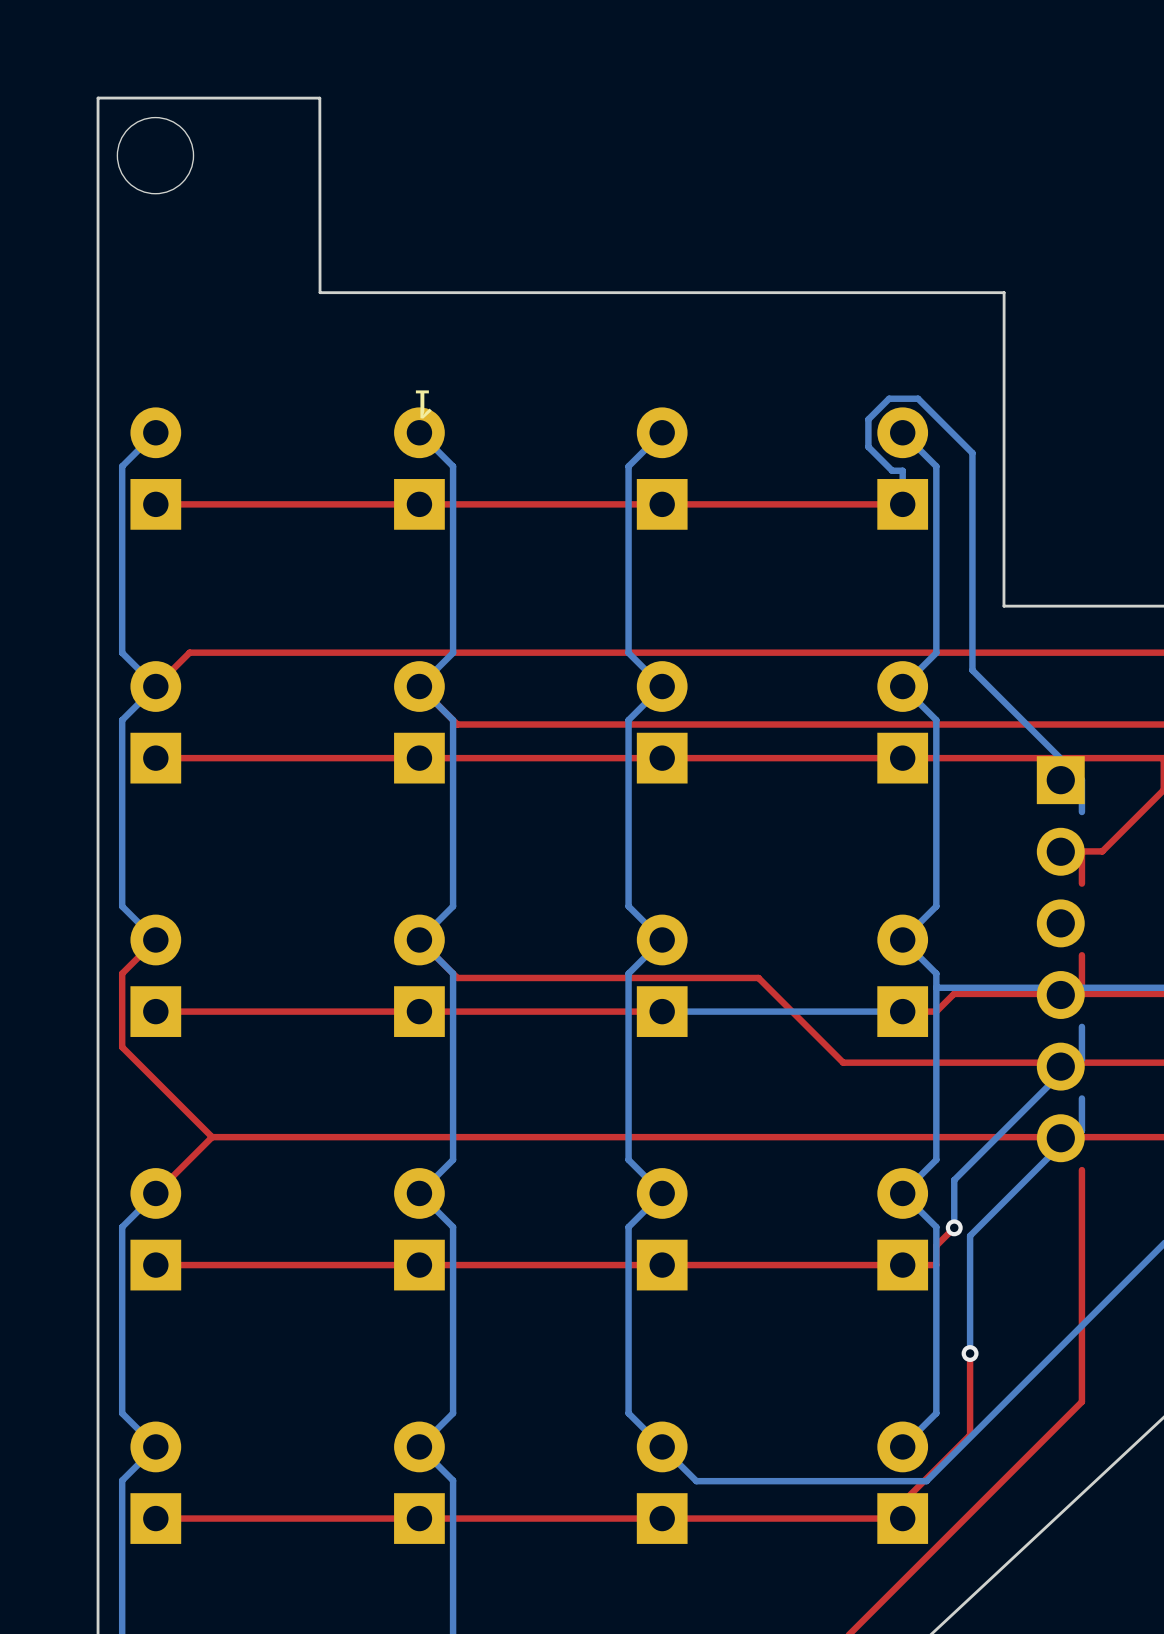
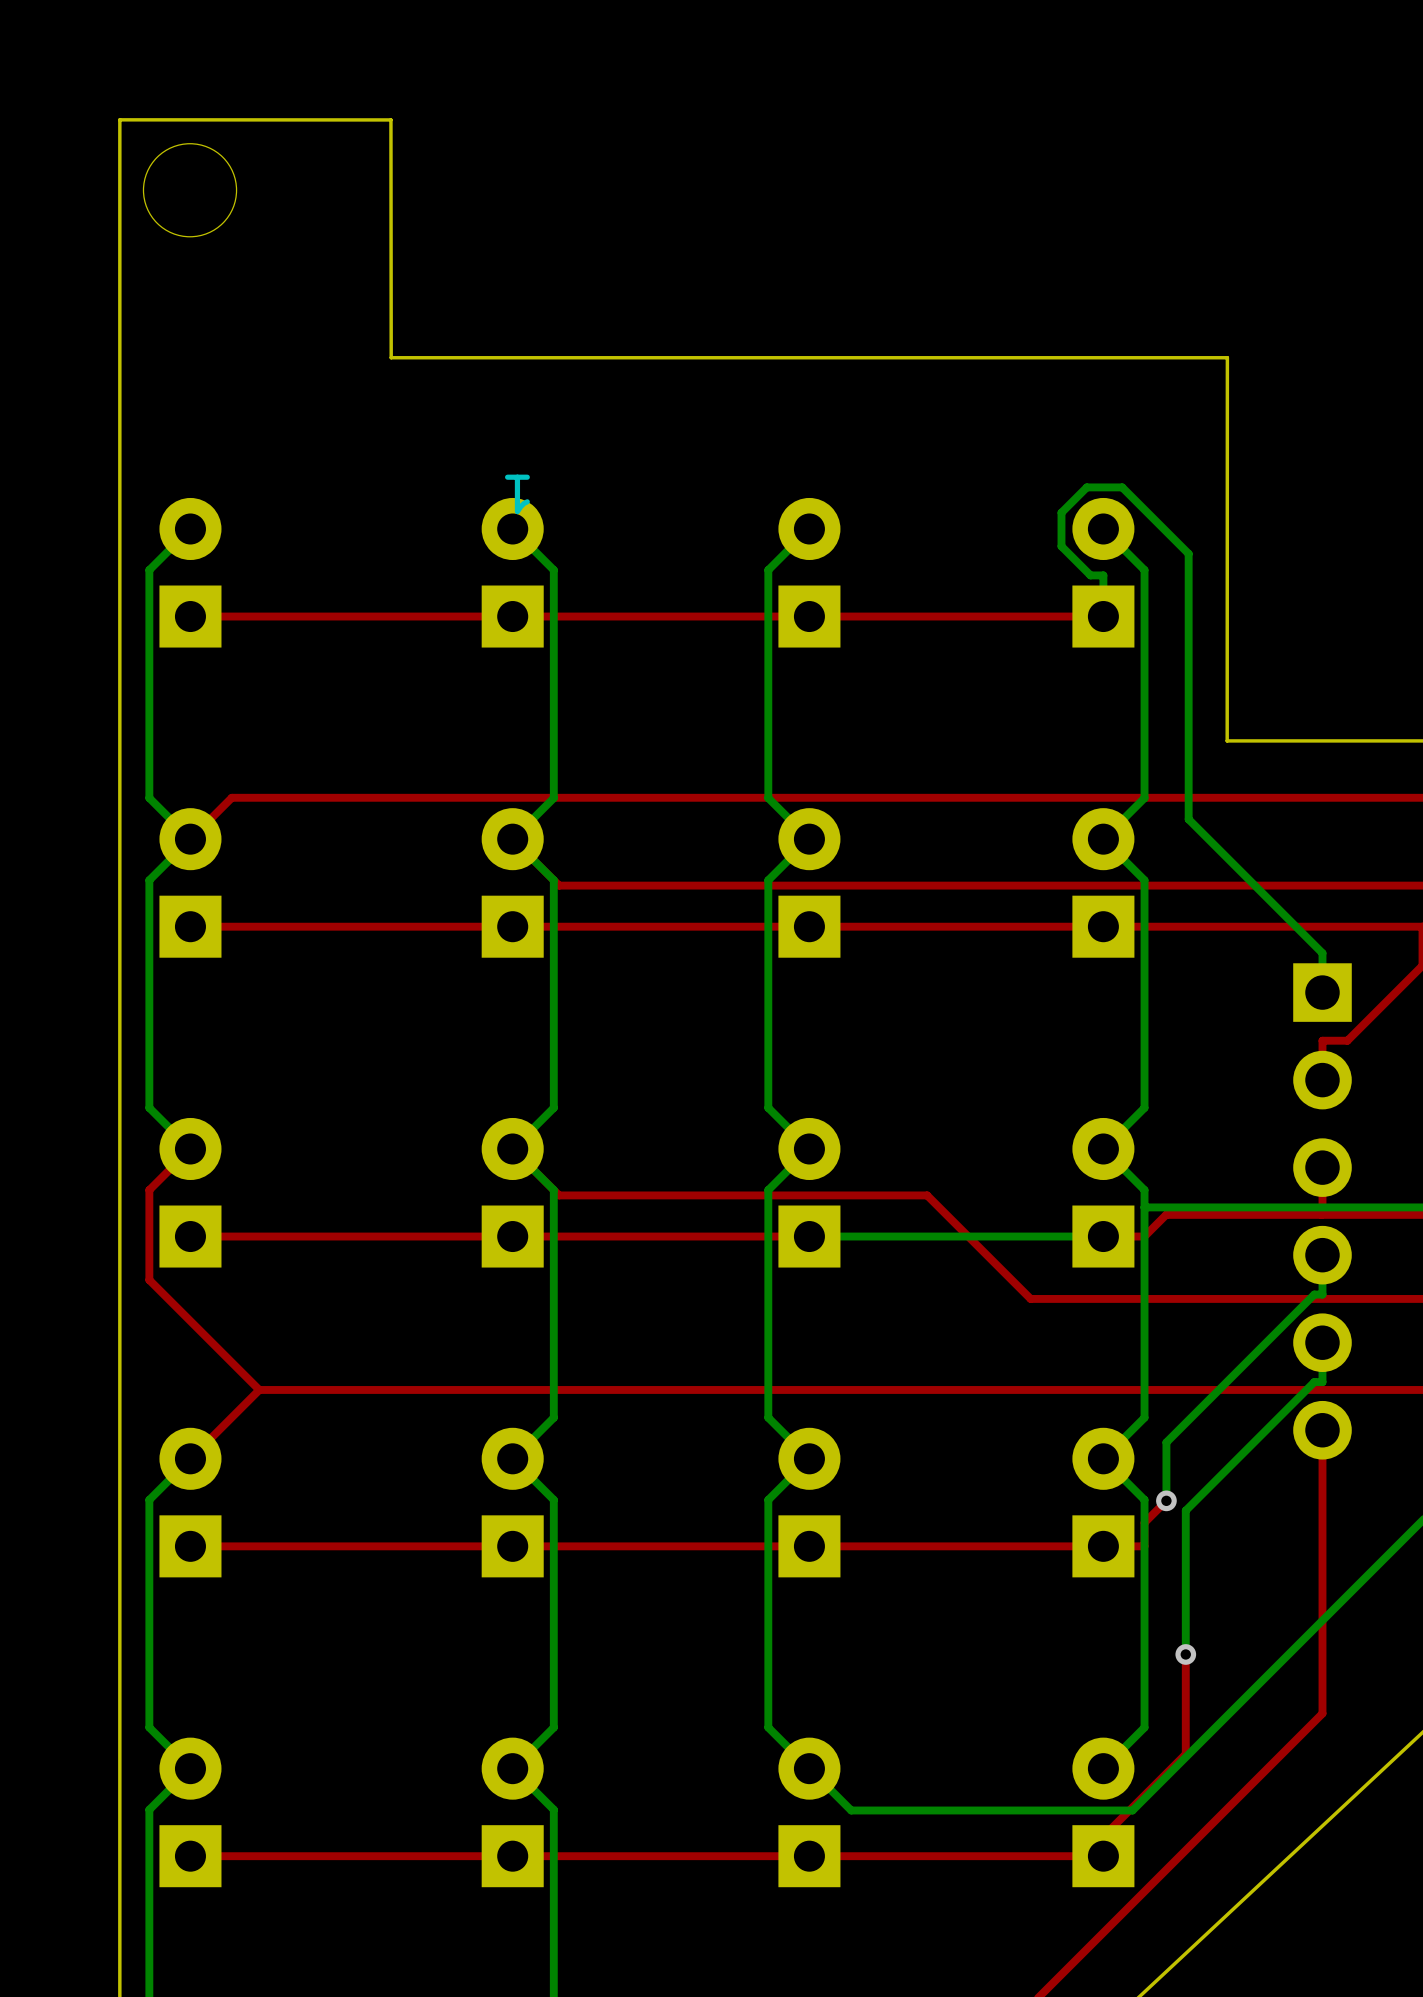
part position: (1060, 959) -> (1322, 1211)

